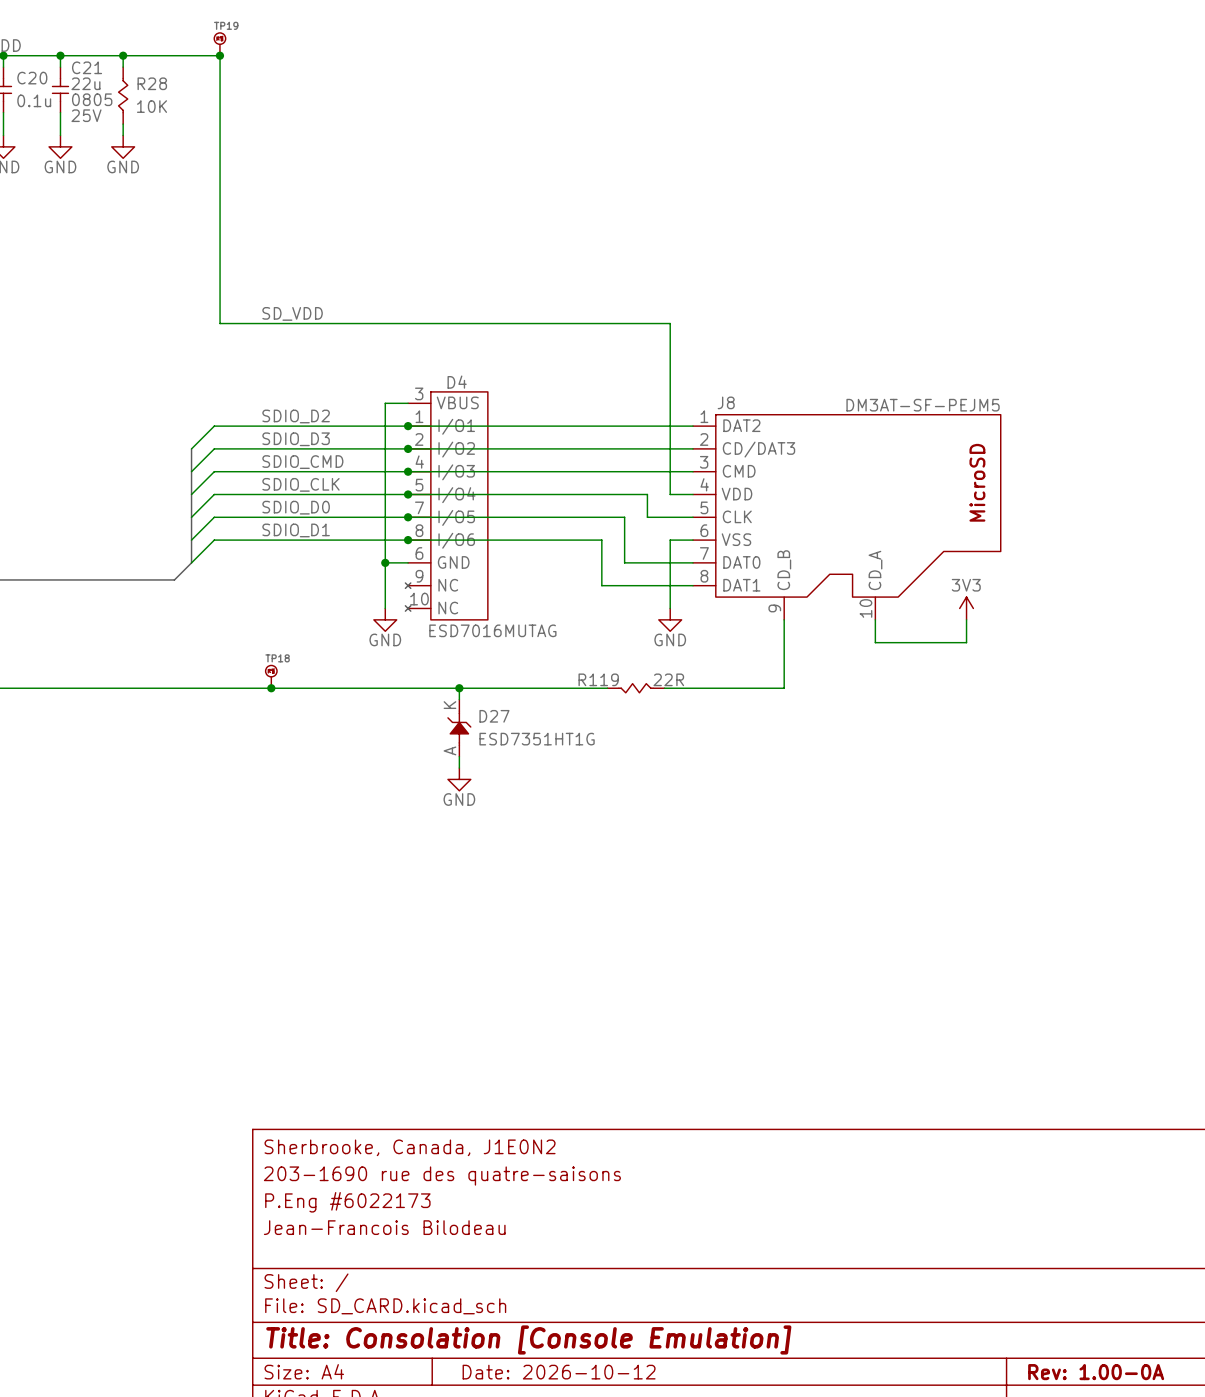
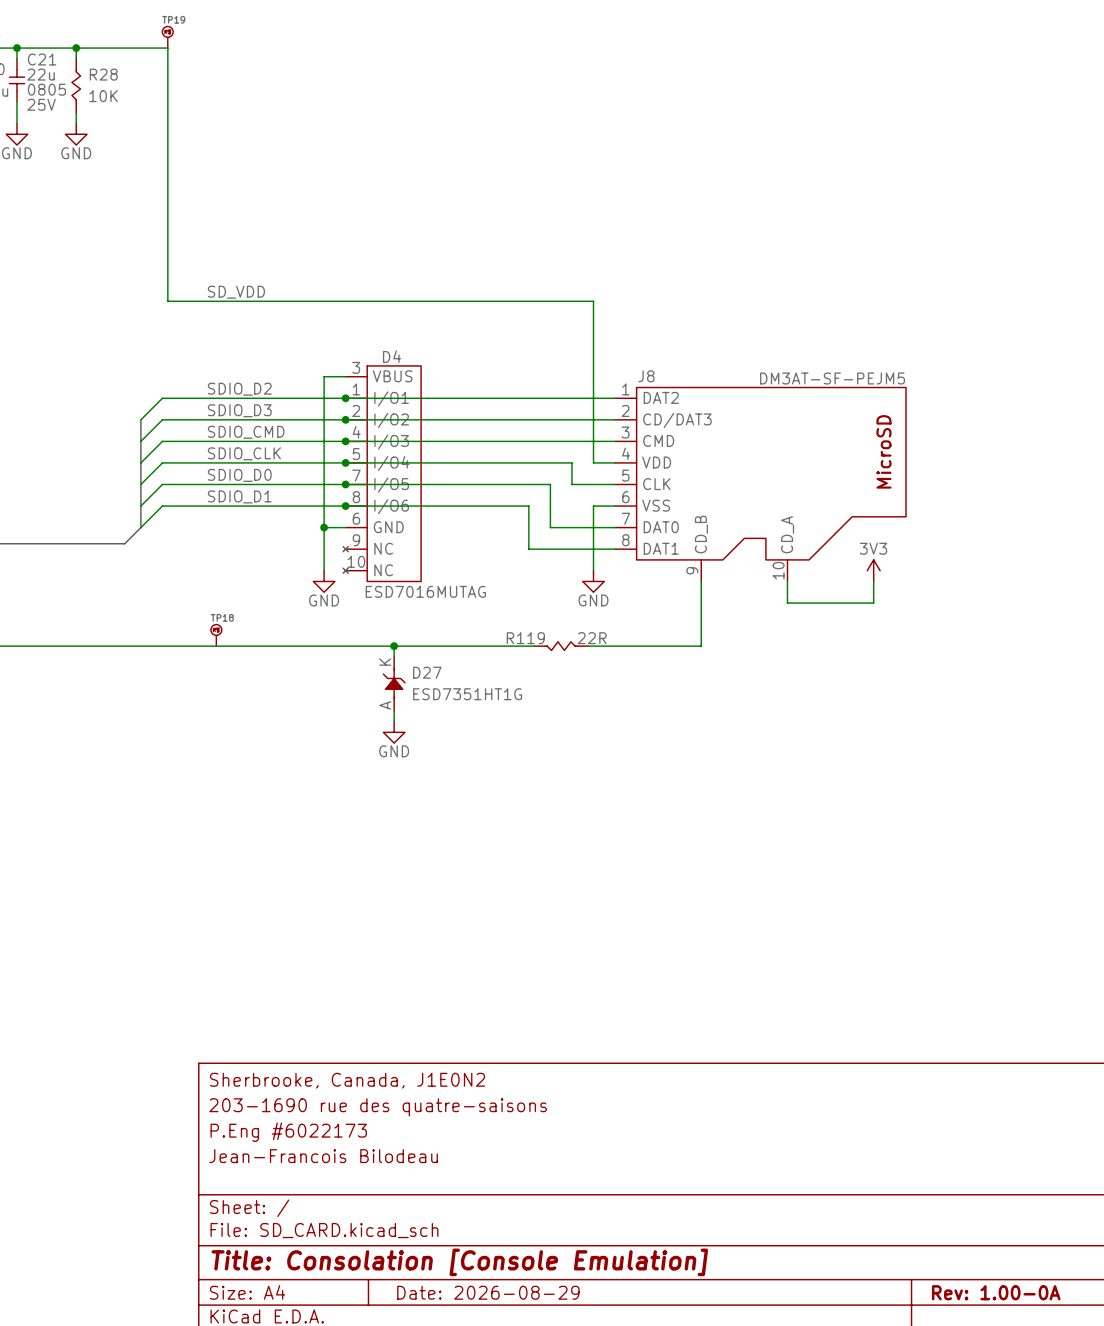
junction: (219, 55) -> none
junction: (271, 688) -> none
title block: Date: 2026-10-12 (559, 1372) -> Date: 2026-08-29 (488, 1292)

